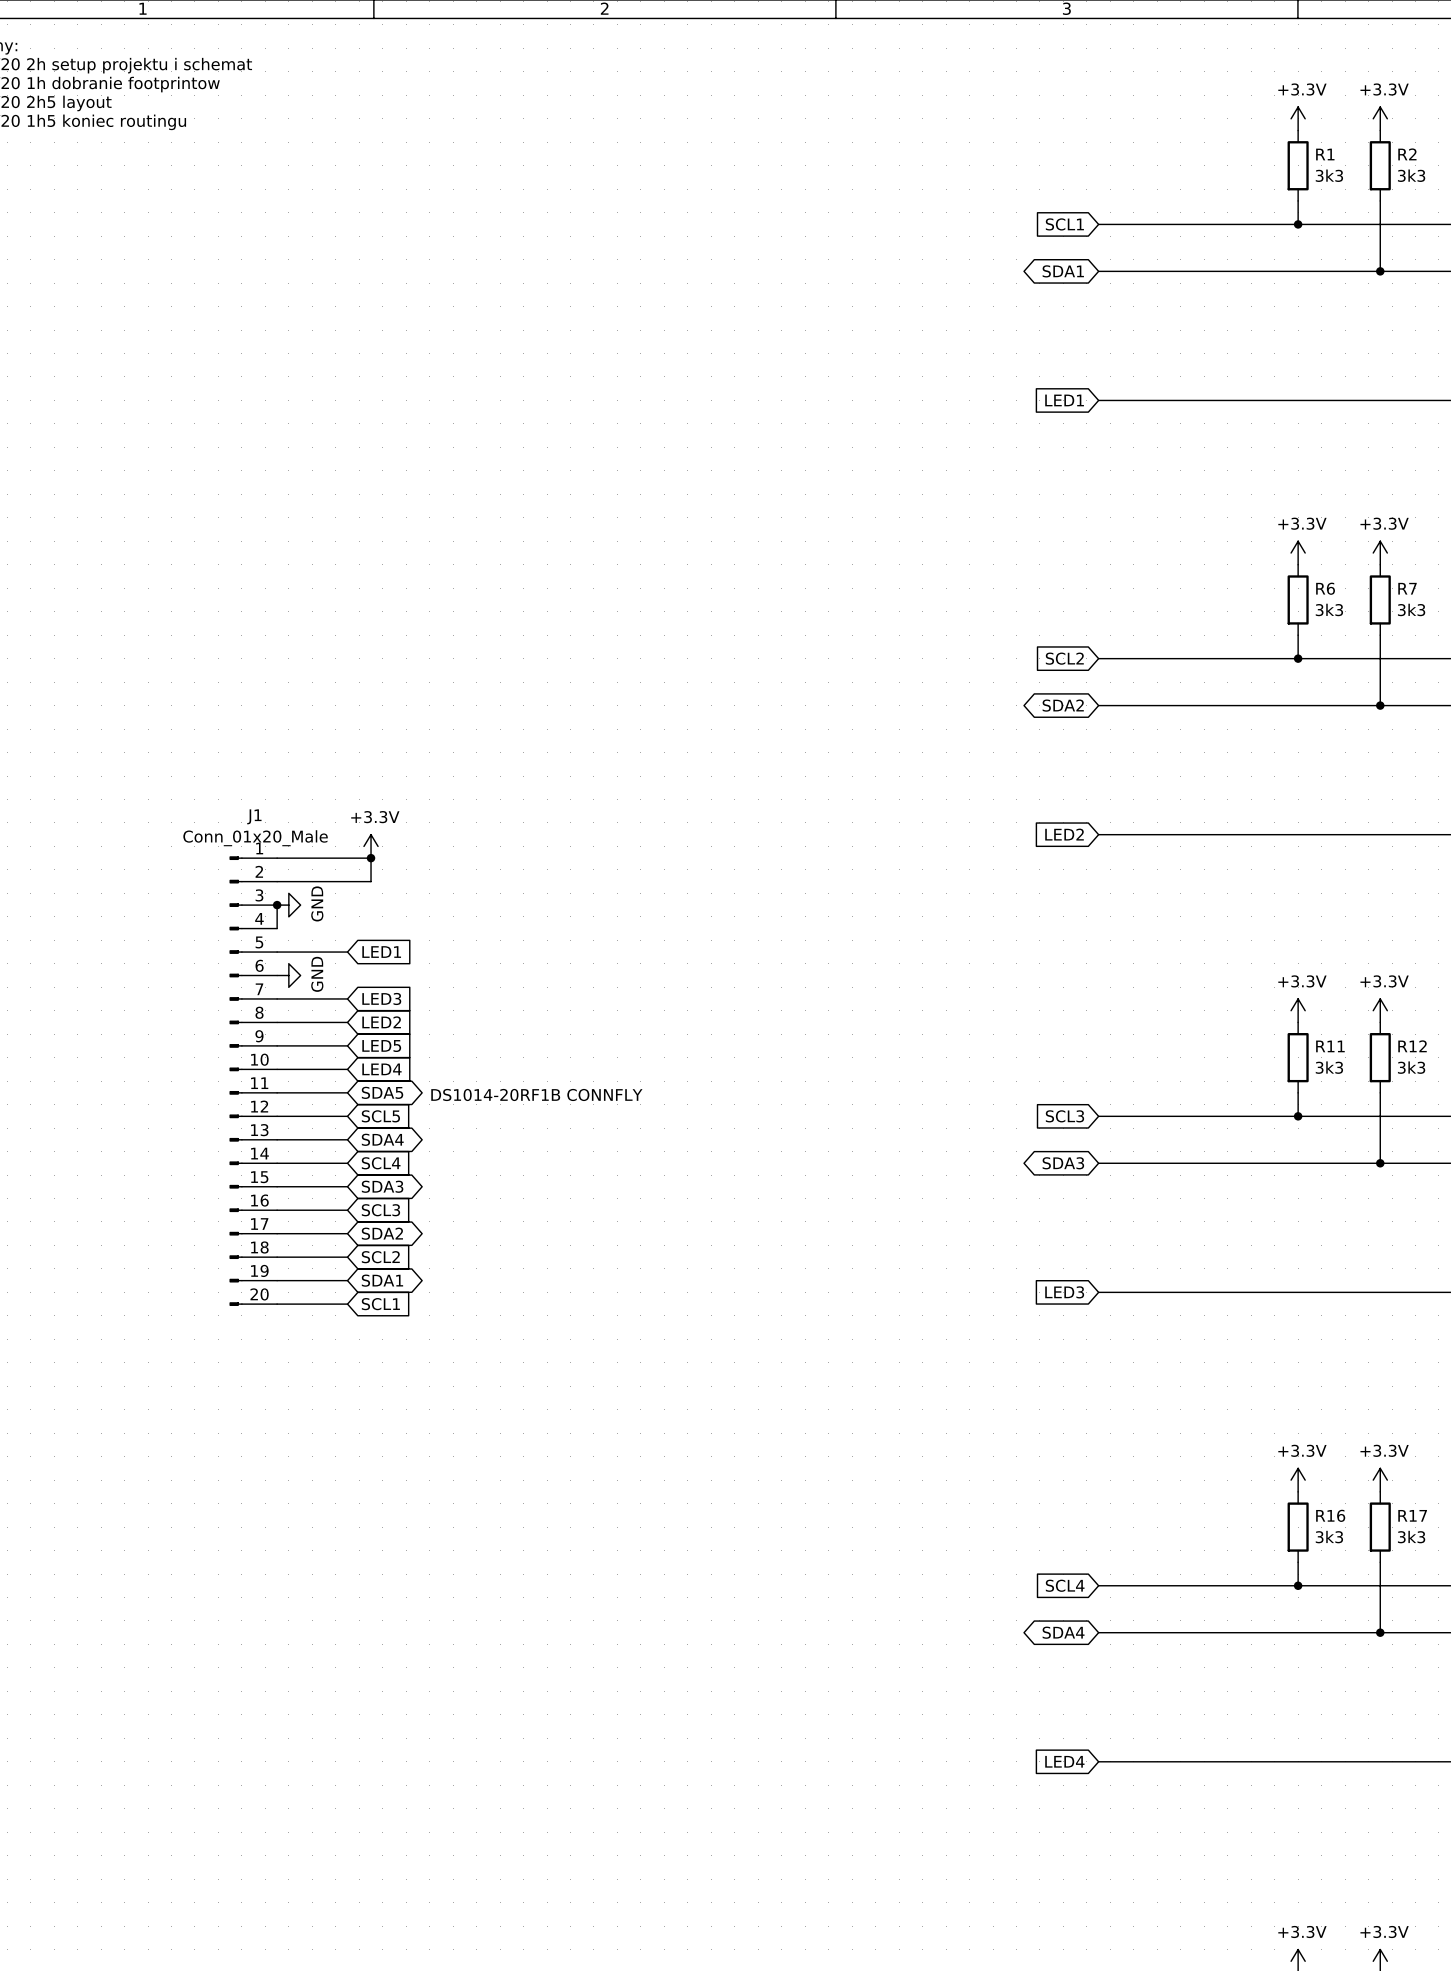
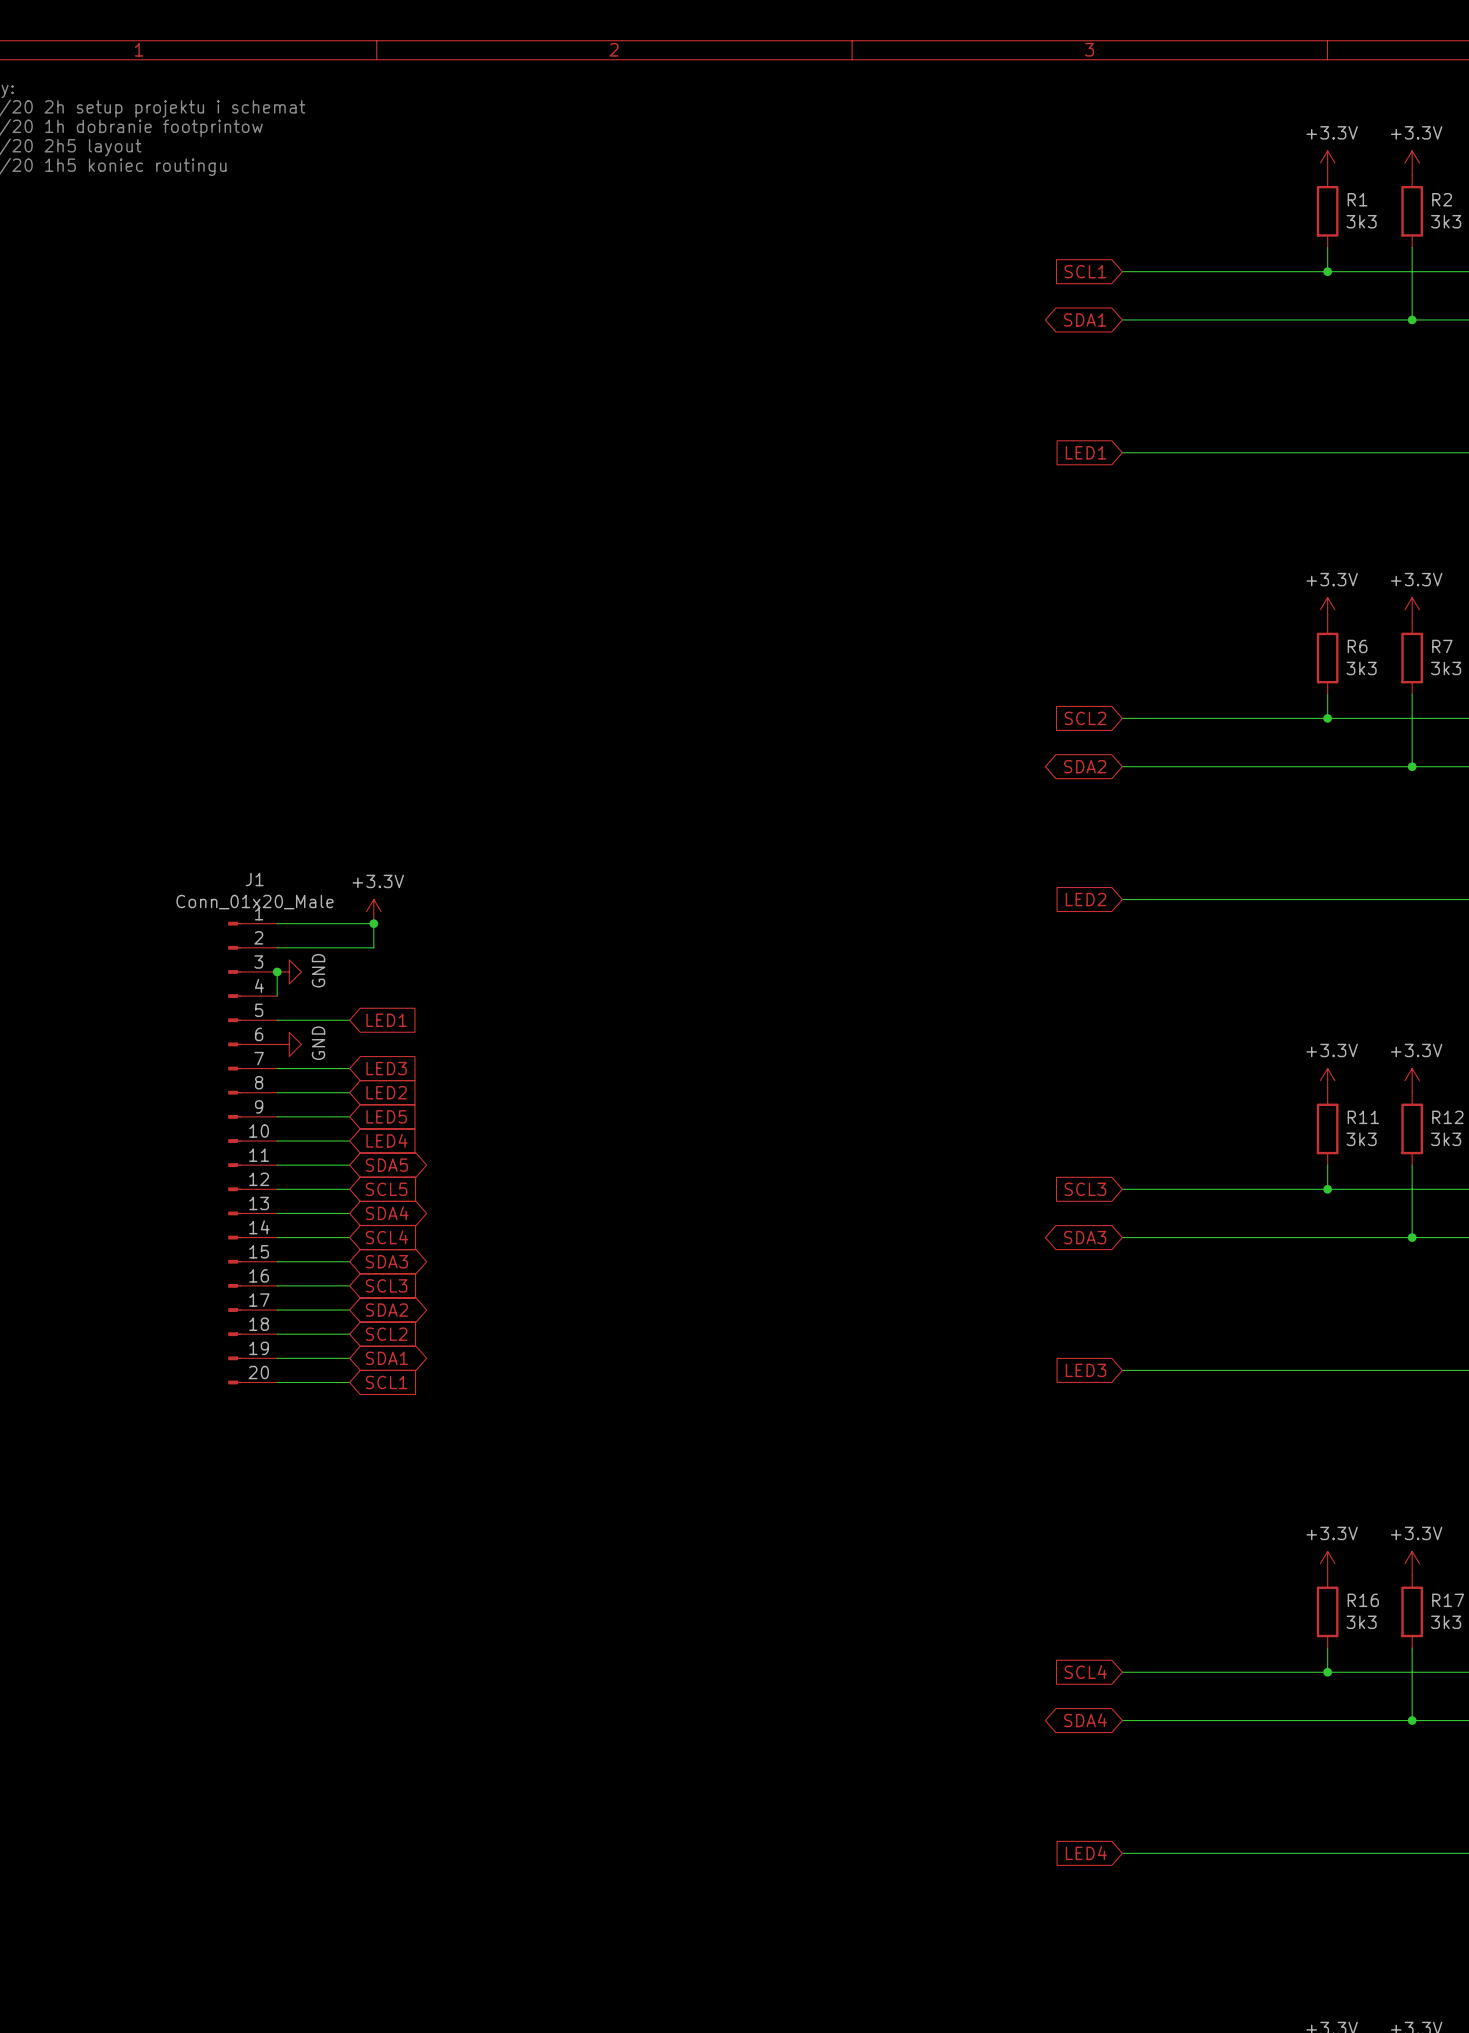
text: DS1014-20RF1B CONNFLY (536, 1094) -> none

